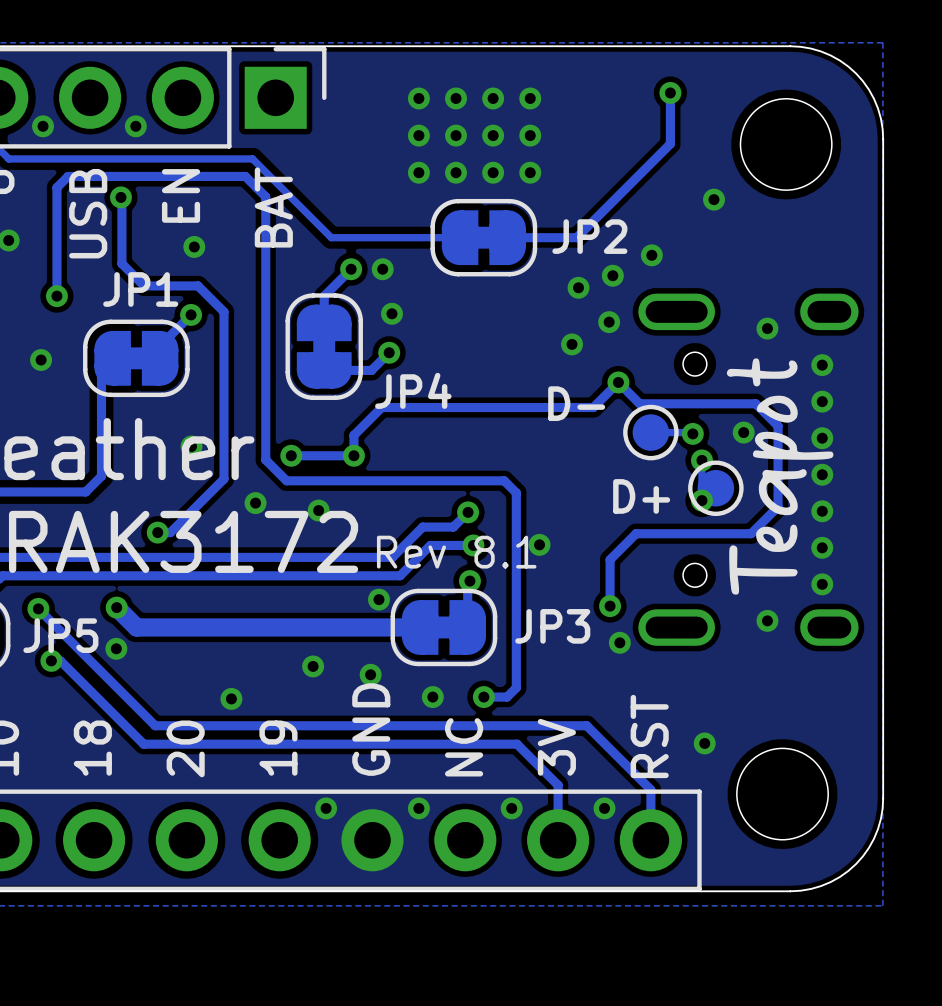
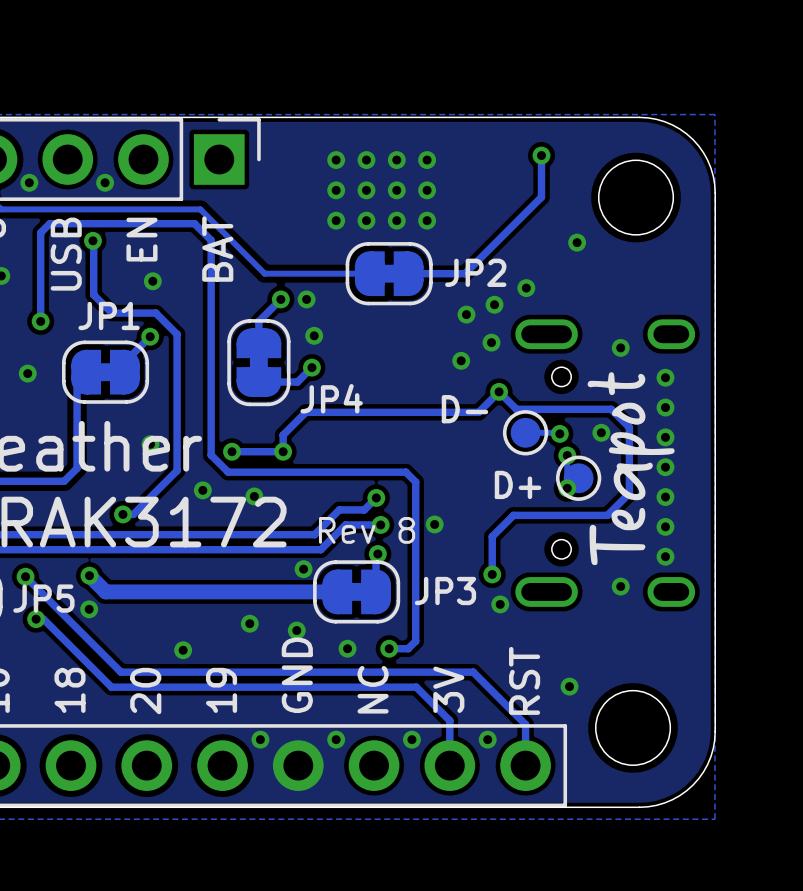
text: Rev 8.1 (456, 552) -> Rev 8 (367, 530)

